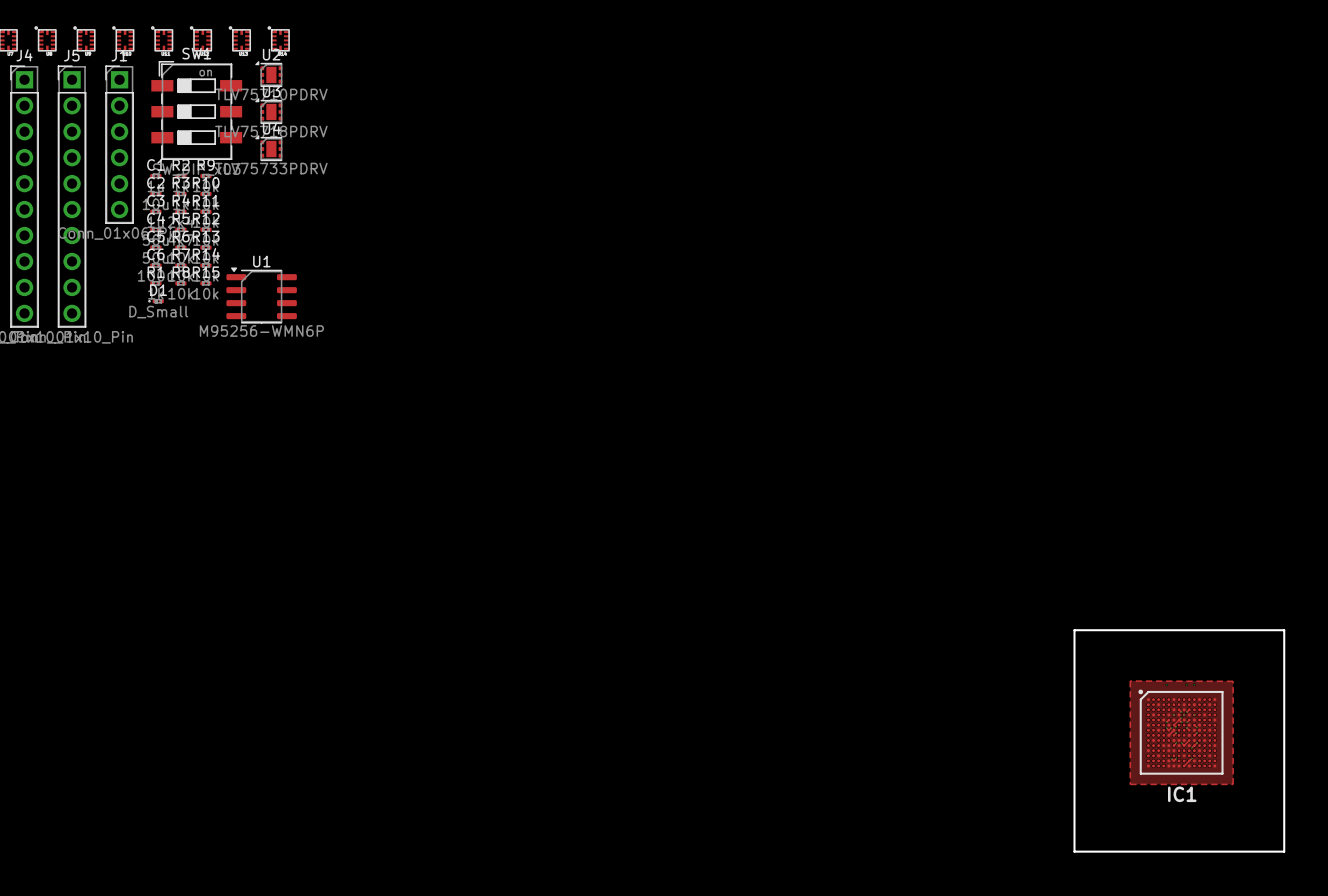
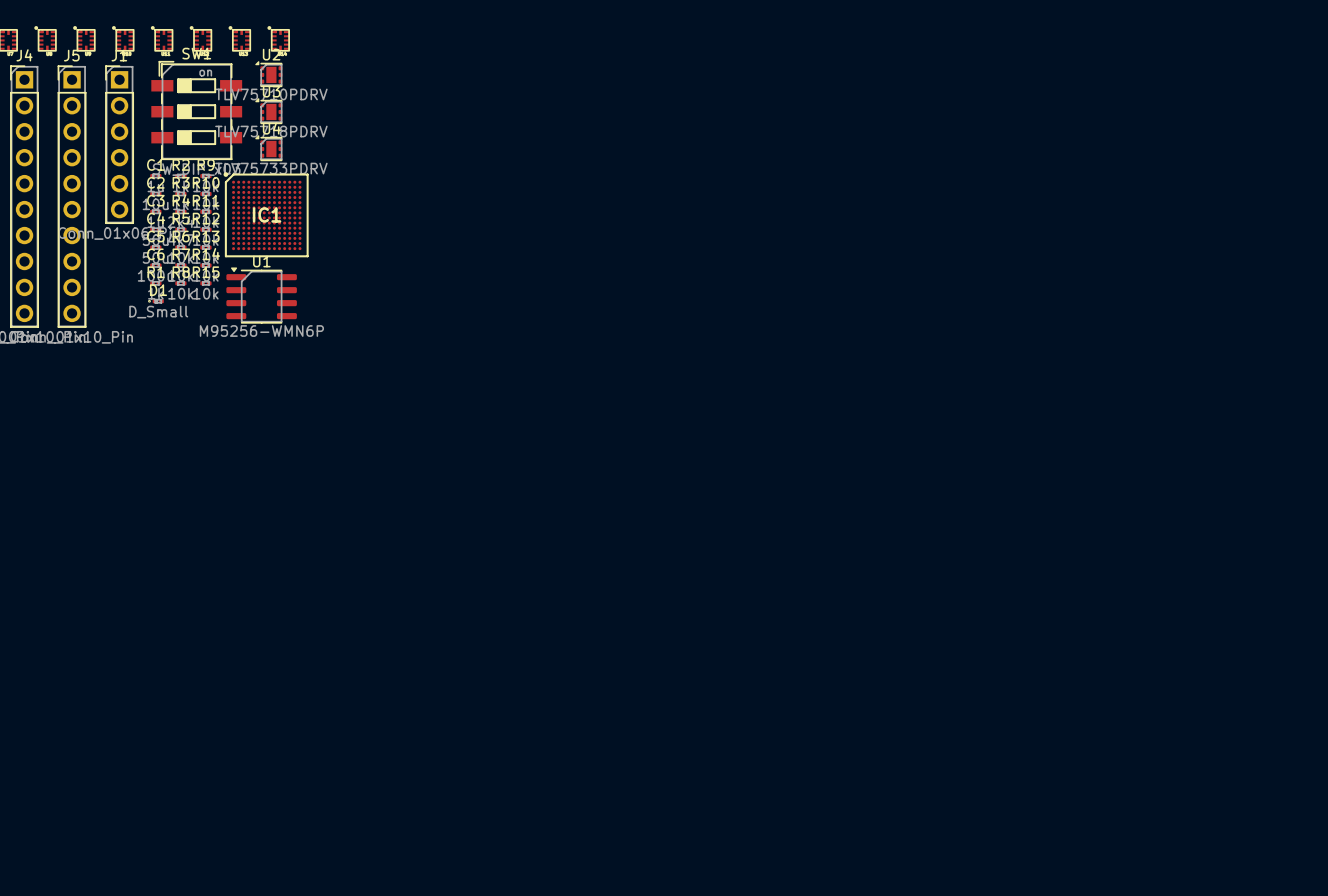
board edge: (1074, 630) (1284, 630) (1284, 851) (1074, 851) (1074, 630) -> none
top zone outline: (1130, 681) (1130, 784) (1233, 784) (1233, 681) (1130, 681) -> none
via: (1166, 684) -> none
via: (1186, 684) -> none
via: (1194, 684) -> none
top track: (1179, 709) (1181, 712) -> none
top track: (1189, 709) (1186, 712) -> none
via: (1181, 712) -> none
via: (1186, 712) -> none
via: (1173, 714) -> none
via: (1184, 714) -> none
via: (1194, 714) -> none
via: (1181, 717) -> none
top track: (1168, 720) (1166, 722) -> none
top track: (1179, 720) (1181, 722) -> none
top track: (1189, 720) (1186, 722) -> none
via: (1166, 722) -> none
via: (1181, 722) -> none
via: (1186, 722) -> none
top track: (1174, 725) (1176, 727) -> none
top track: (1194, 725) (1197, 727) -> none
top track: (1171, 727) (1168, 730) (1166, 728) -> none
via: (1171, 727) -> none
via: (1176, 727) -> none
top track: (1186, 727) (1189, 730) -> none
via: (1186, 727) -> none
via: (1197, 727) -> none
via: (1166, 728) -> none
top track: (1173, 730) (1168, 735) -> none
top track: (1176, 732) (1173, 735) -> none
via: (1176, 732) -> none
IC1 position: (1180, 732) -> (266, 214)
top track: (1197, 732) (1194, 735) -> none
via: (1197, 732) -> none
top track: (1189, 740) (1184, 745) (1181, 743) -> none
top track: (1197, 742) (1191, 747) -> none
via: (1197, 742) -> none
top track: (1176, 743) (1173, 745) -> none
via: (1176, 743) -> none
via: (1181, 743) -> none
via: (1191, 747) -> none
top track: (1171, 758) (1173, 760) -> none
via: (1171, 758) -> none
top track: (1176, 758) (1173, 760) -> none
via: (1176, 758) -> none
top track: (1191, 758) (1184, 766) -> none
via: (1191, 758) -> none
IC1 name position: IC1 (1182, 794) -> IC1 (267, 214)

